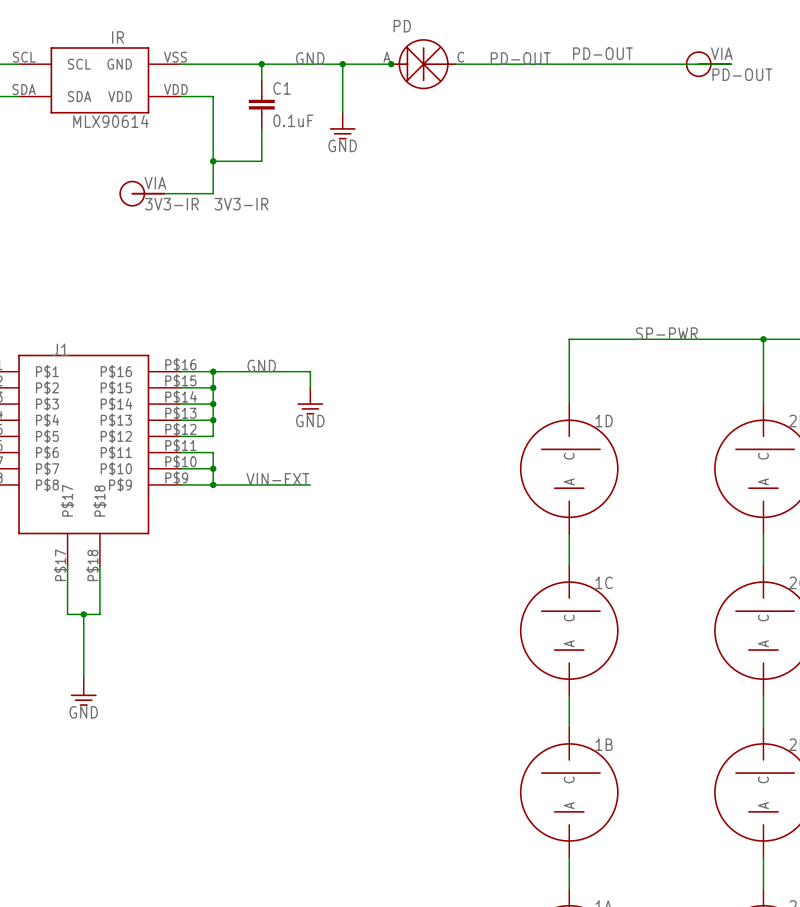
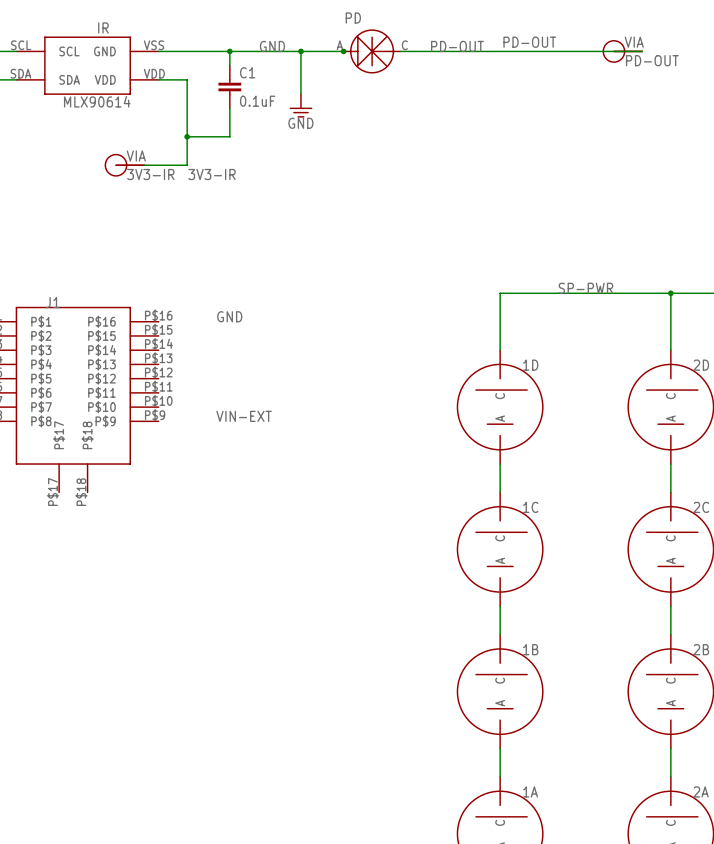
wire: (180, 371) (310, 371) (310, 387) -> none
wire: (213, 371) (213, 436) (180, 436) -> none
junction: (213, 371) -> none
wire: (180, 387) (213, 387) -> none
junction: (213, 387) -> none
power symbol: GND (310, 401) -> none
wire: (180, 404) (213, 404) -> none
junction: (213, 404) -> none
wire: (180, 420) (213, 420) -> none
junction: (213, 420) -> none
wire: (180, 452) (213, 452) (213, 484) -> none
wire: (180, 468) (213, 468) -> none
junction: (213, 468) -> none
wire: (180, 484) (310, 484) -> none
junction: (213, 484) -> none
wire: (67, 565) (67, 614) (99, 614) (99, 565) -> none
wire: (83, 614) (83, 679) -> none
junction: (83, 614) -> none
power symbol: GND (83, 692) -> none

